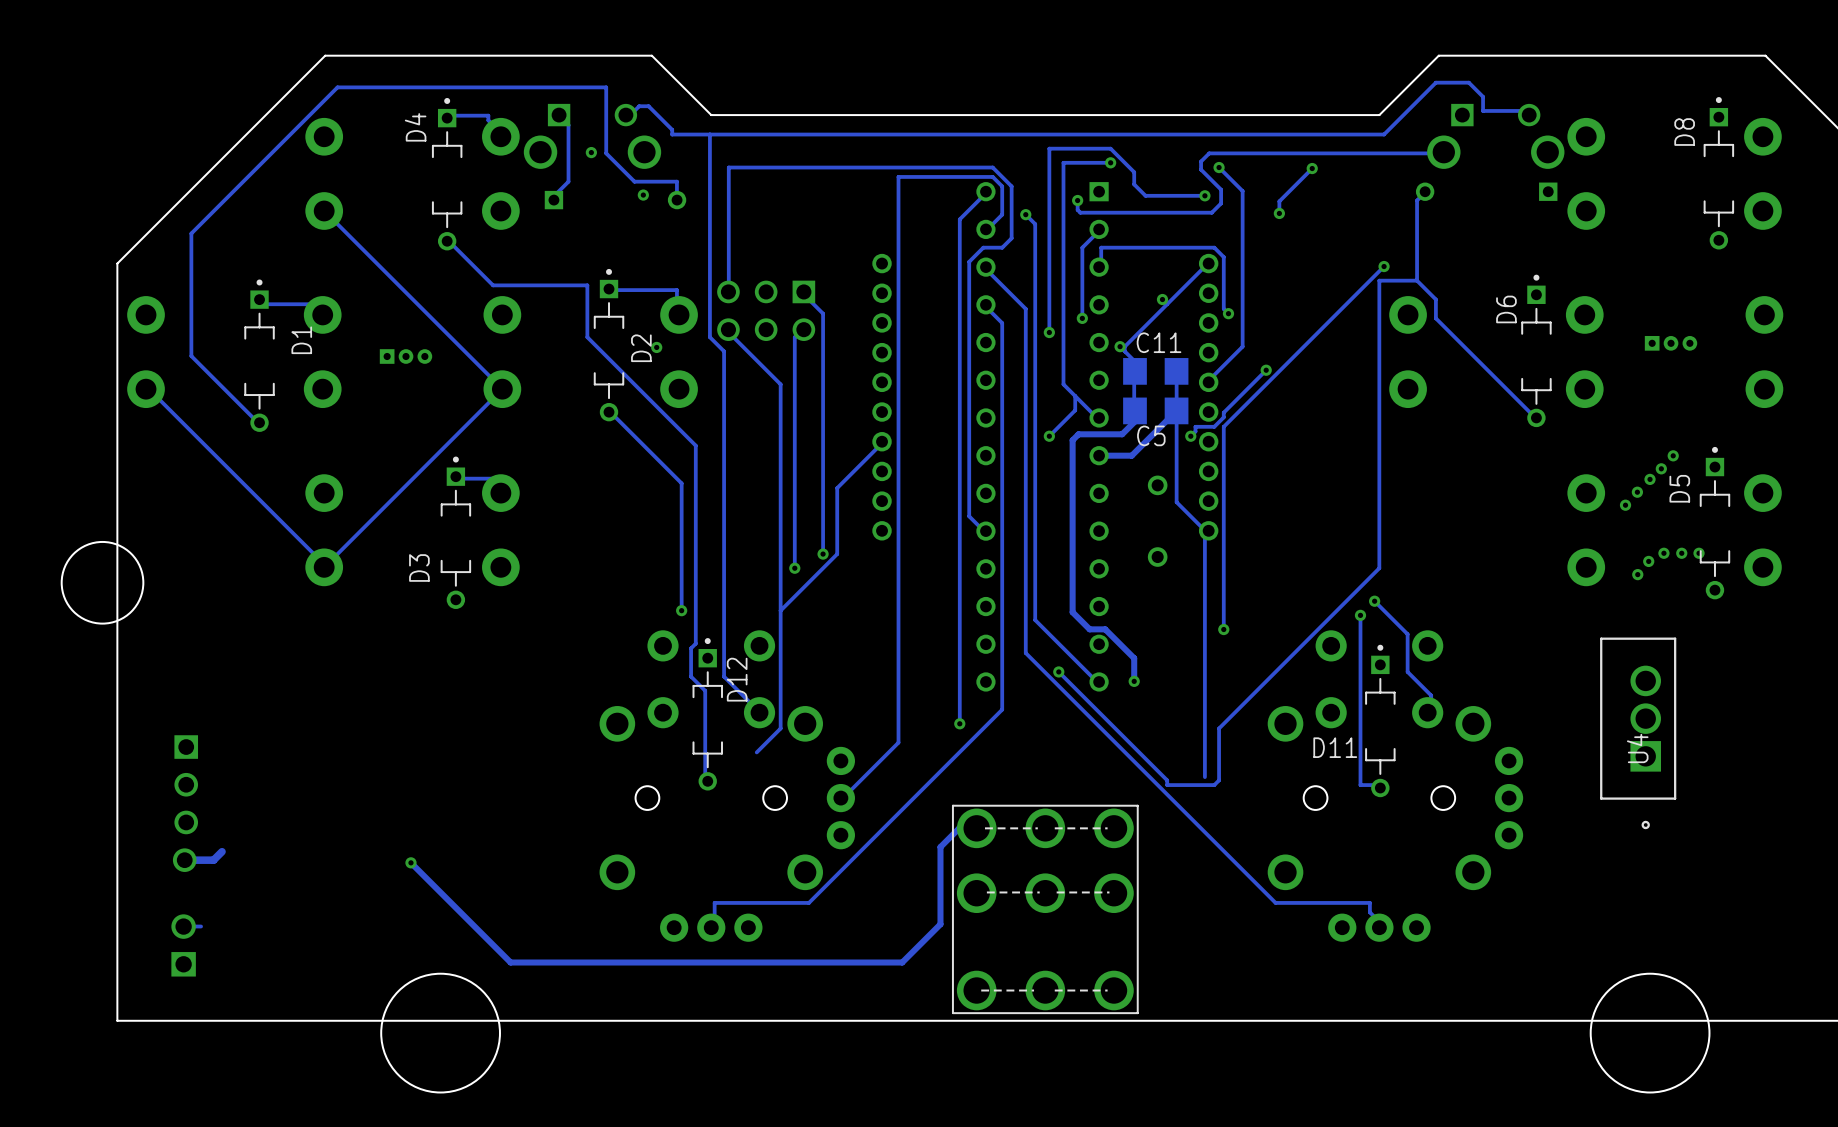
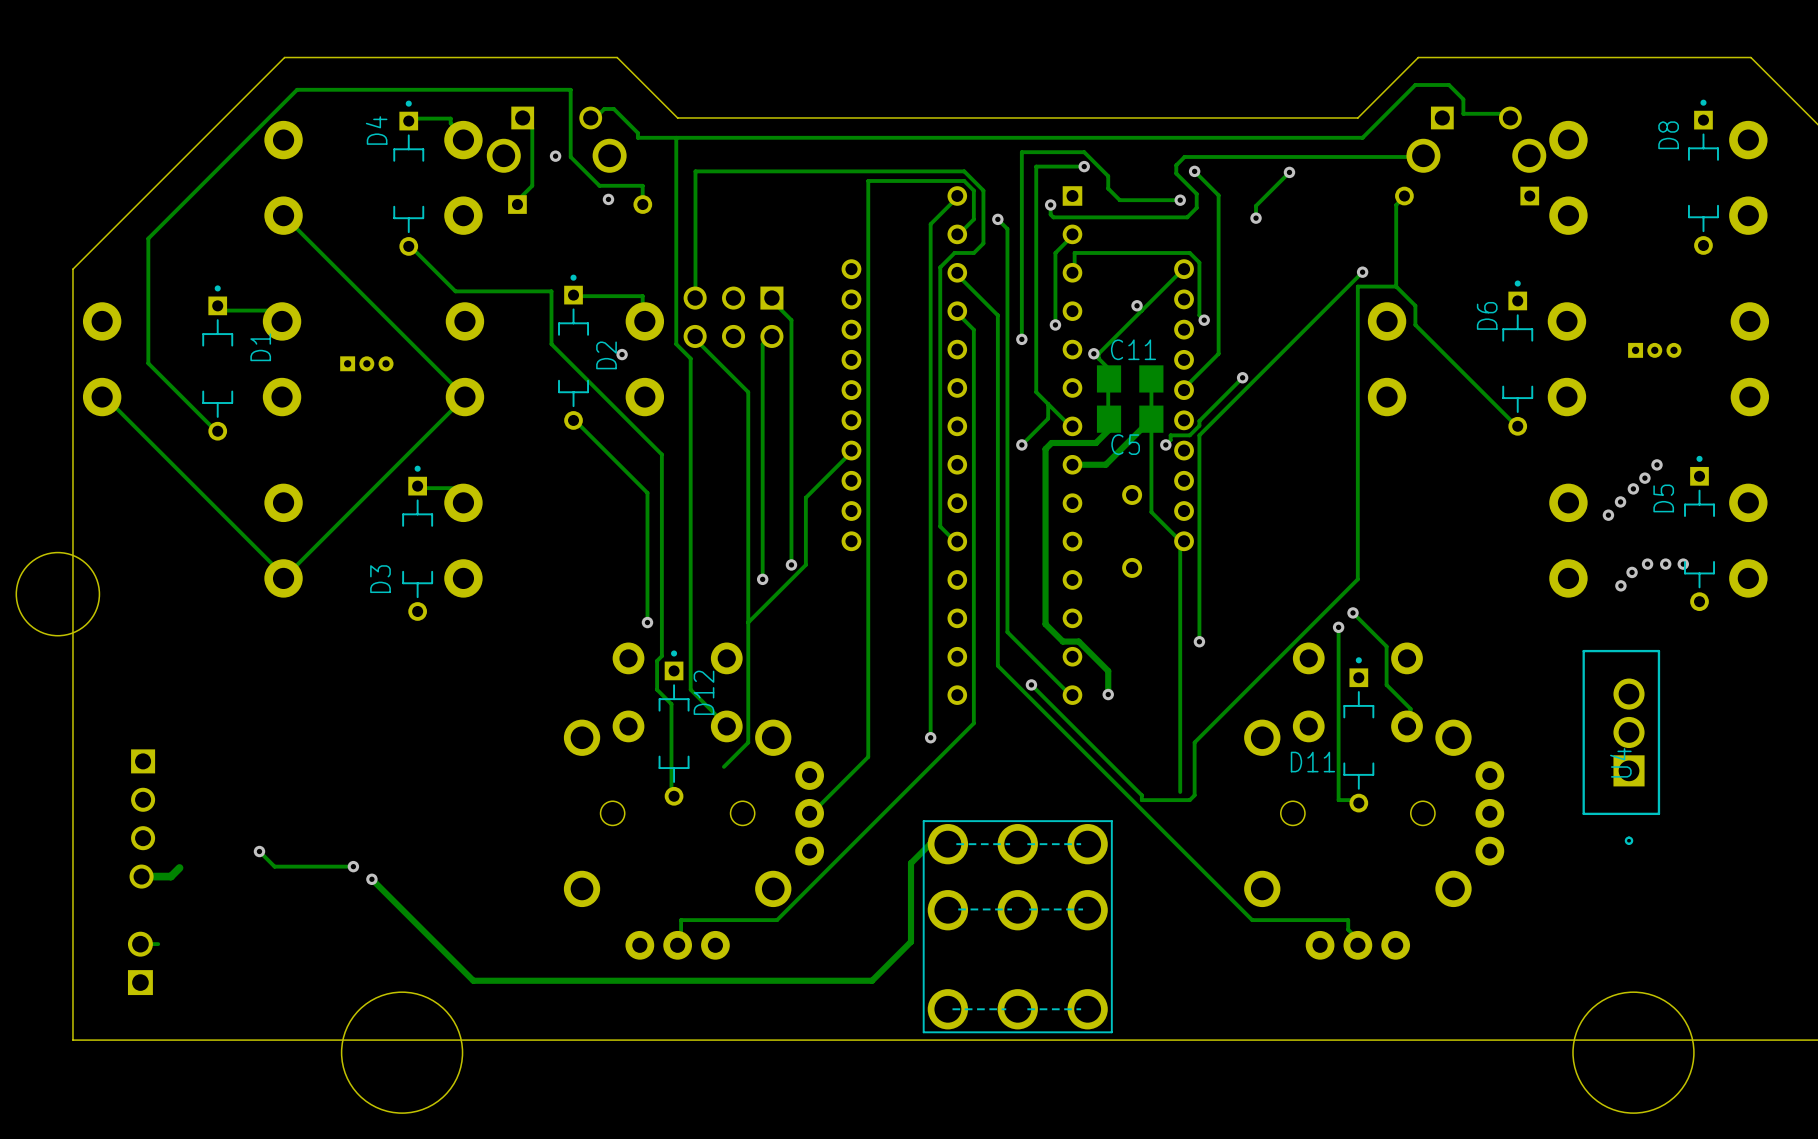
track: none -> (259, 851) (274, 866) (353, 866)
via: none -> (259, 851)
via: none -> (353, 866)

